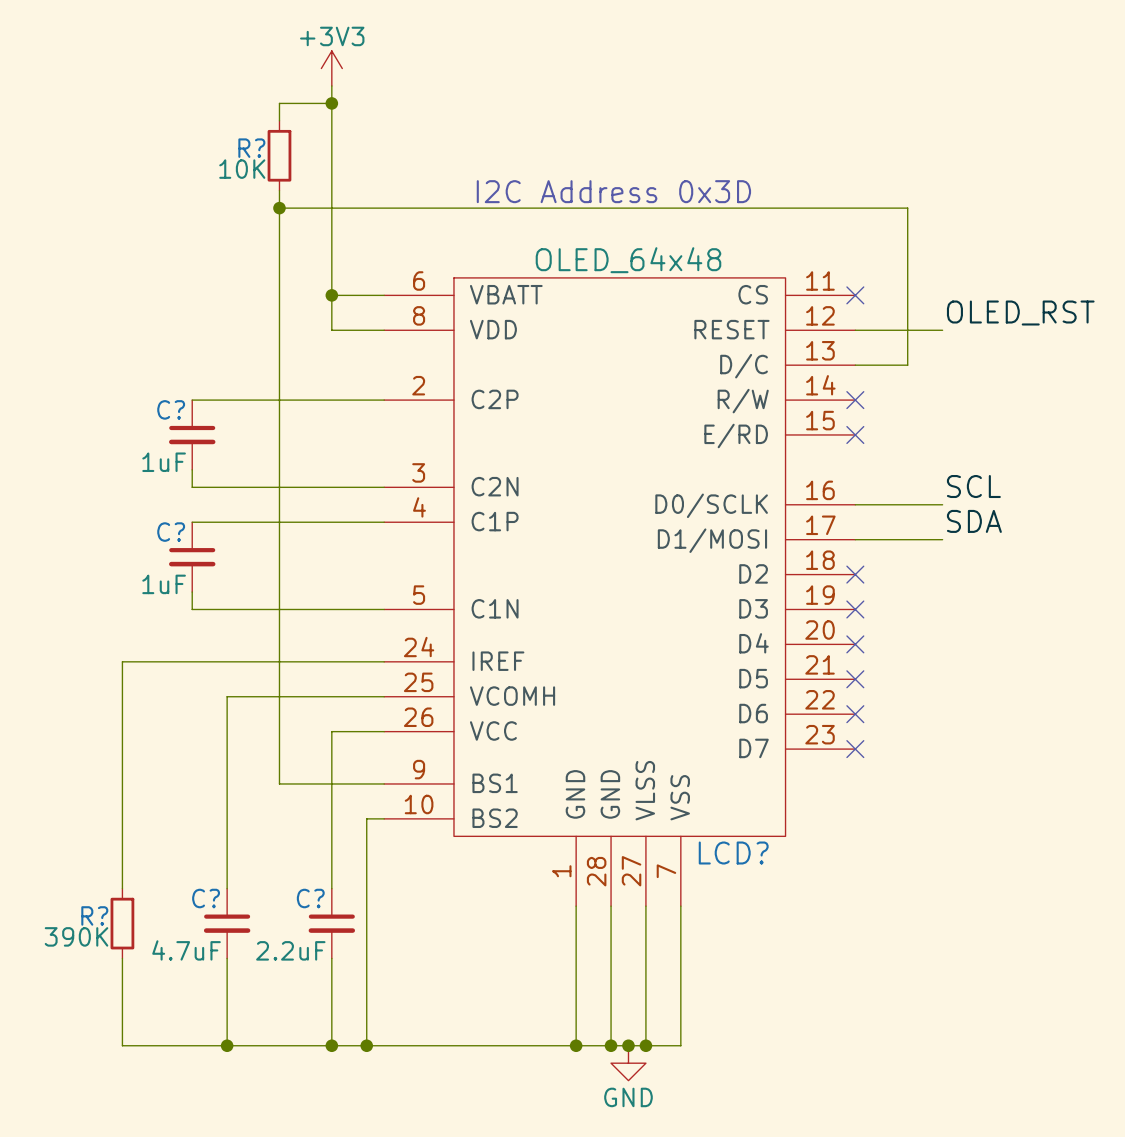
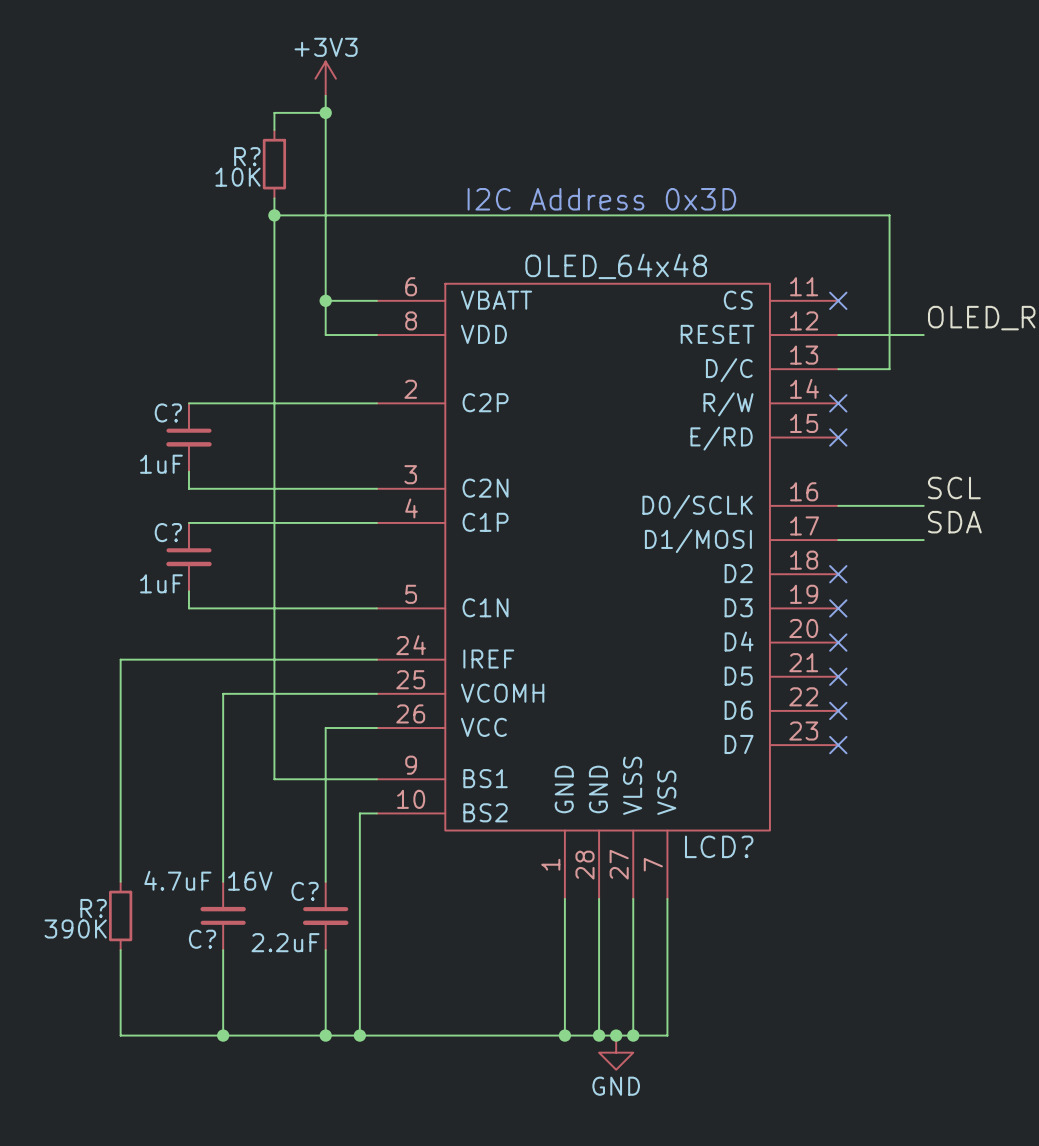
C? name position: C? (206, 898) -> C? (202, 939)
C? rotation: 0° (227, 923) -> 180° (223, 915)
C? value: 4.7uF (186, 950) -> 4.7uF 16V (208, 880)

